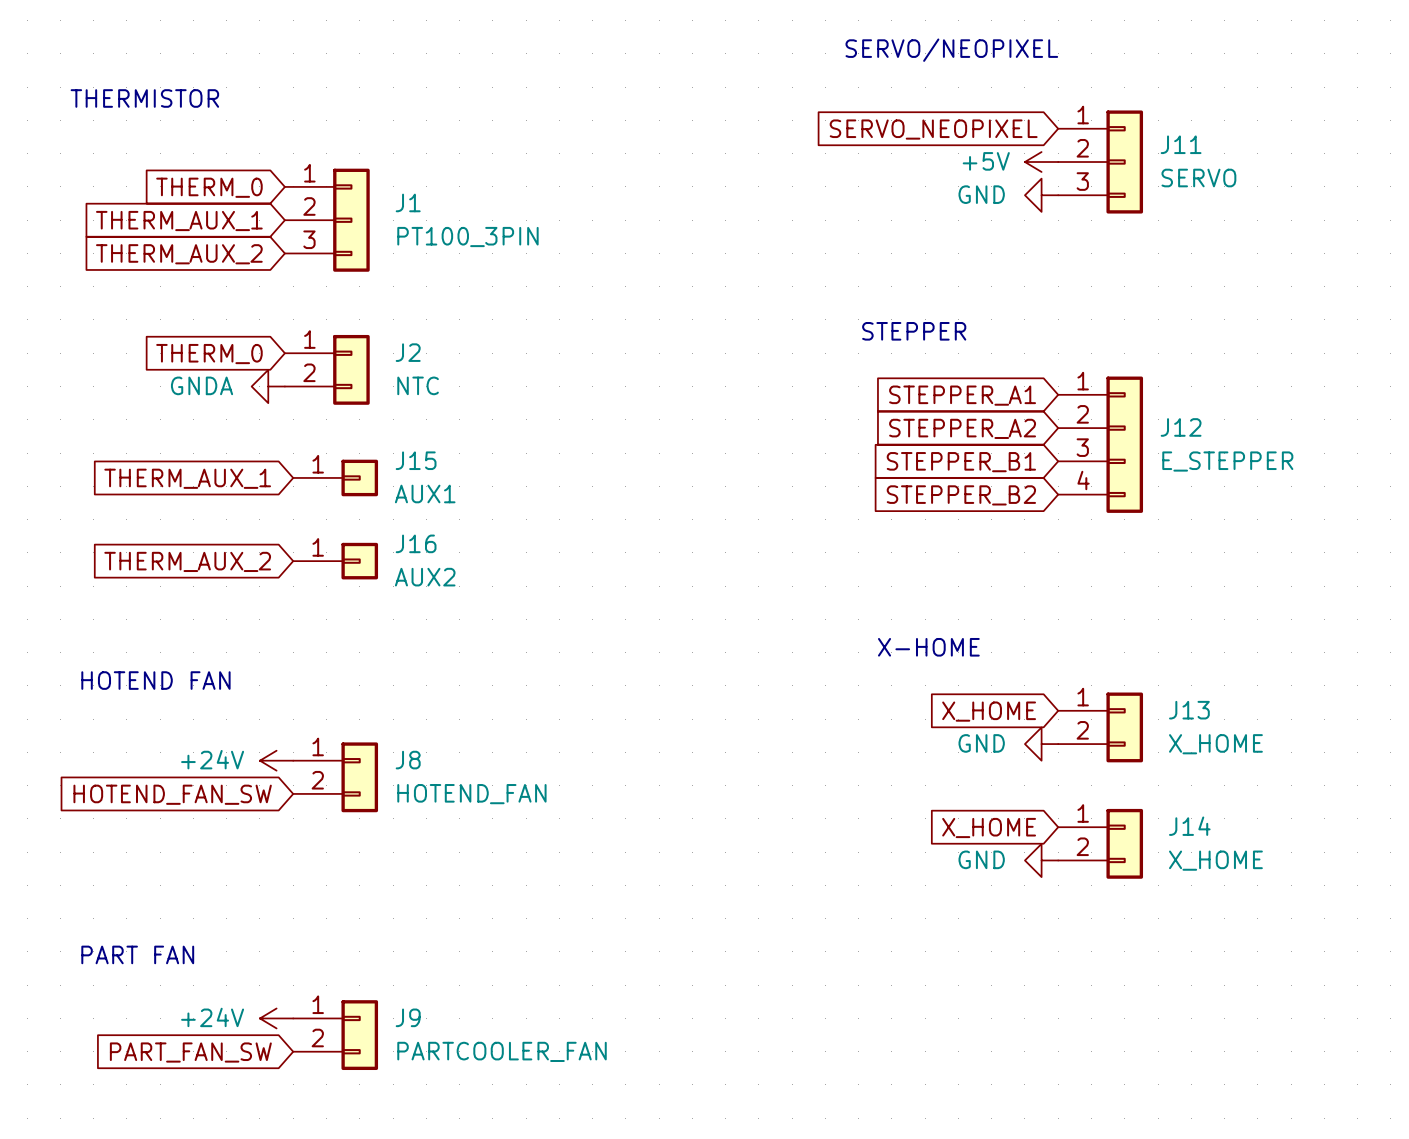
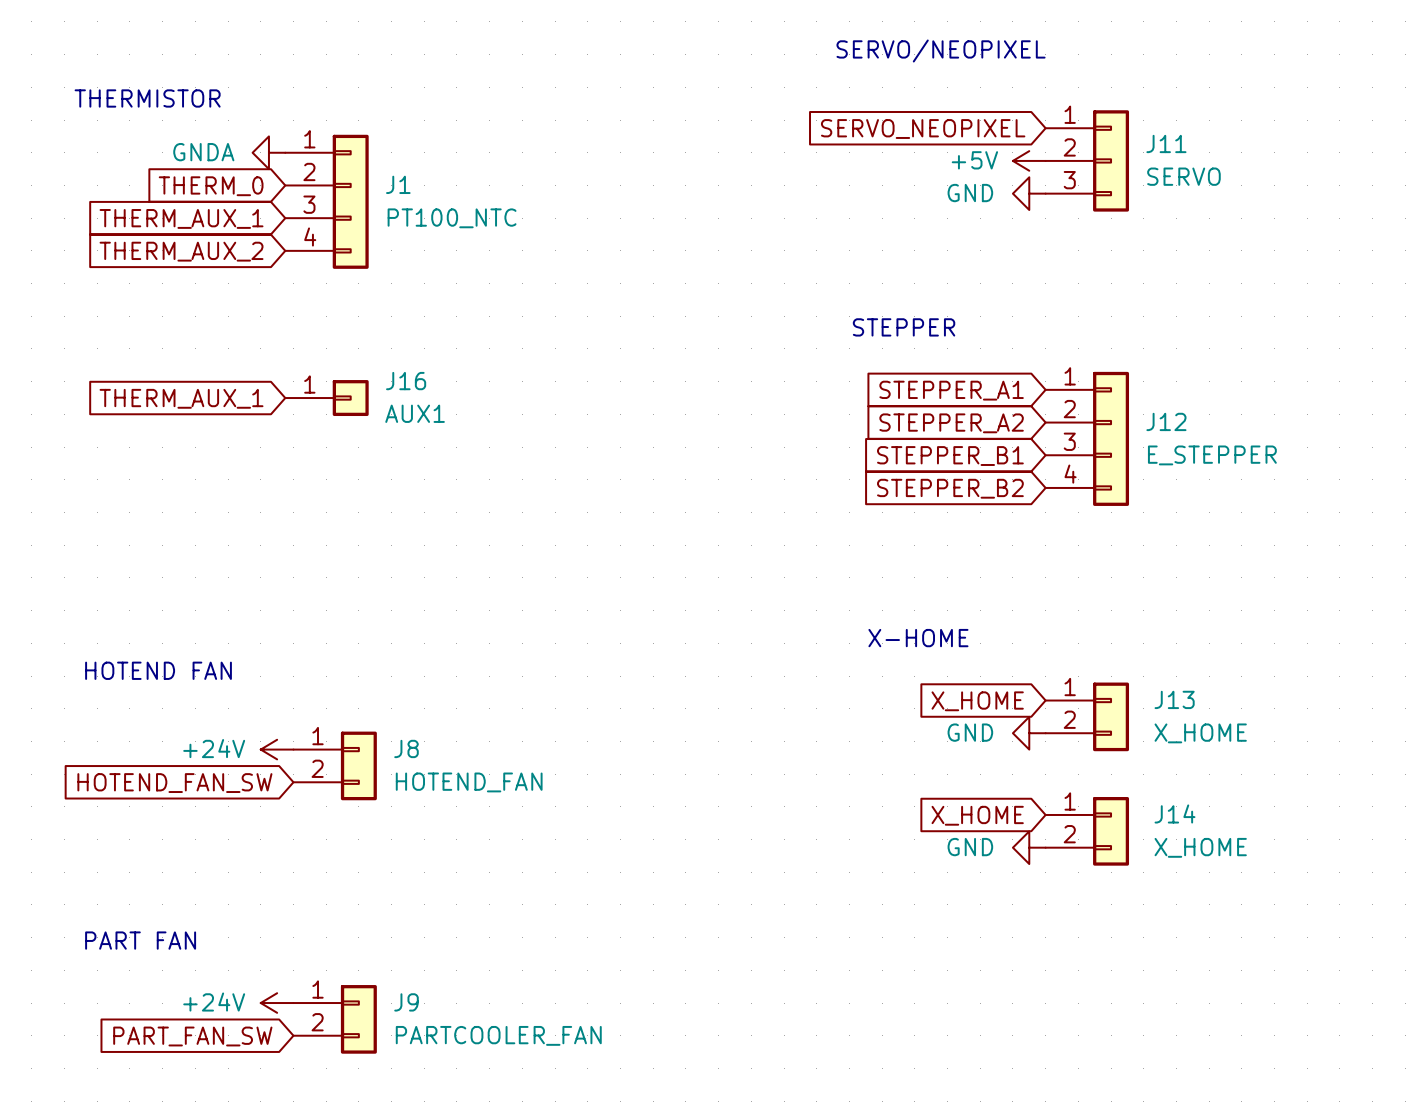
J1 symbol: [284, 168, 370, 272] -> [285, 134, 369, 269]
J1 value: PT100_3PIN (467, 237) -> PT100_NTC (452, 218)
global label: THERM_0 (209, 354) -> none
J2: NTC (327, 369) -> none
power symbol position: GNDA (268, 386) -> GNDA (268, 152)
J15: AUX1 (335, 477) -> none
global label position: THERM_AUX_1 (187, 478) -> THERM_AUX_1 (181, 398)
global label: THERM_AUX_2 (187, 561) -> none
J16 position: (335, 561) -> (327, 398)
J16 value: AUX2 (425, 577) -> AUX1 (415, 413)

